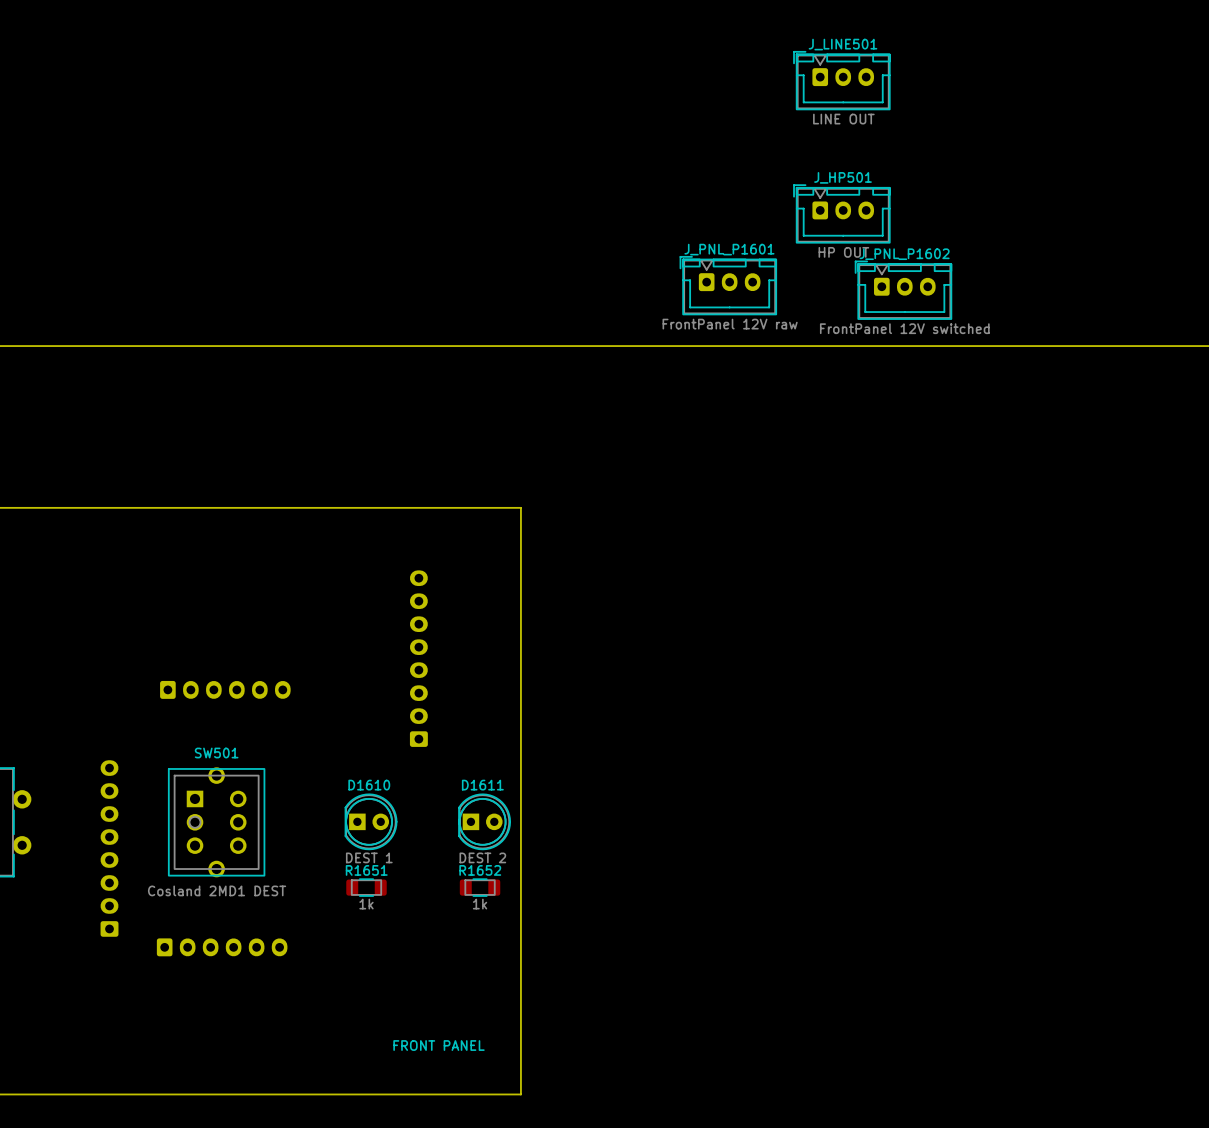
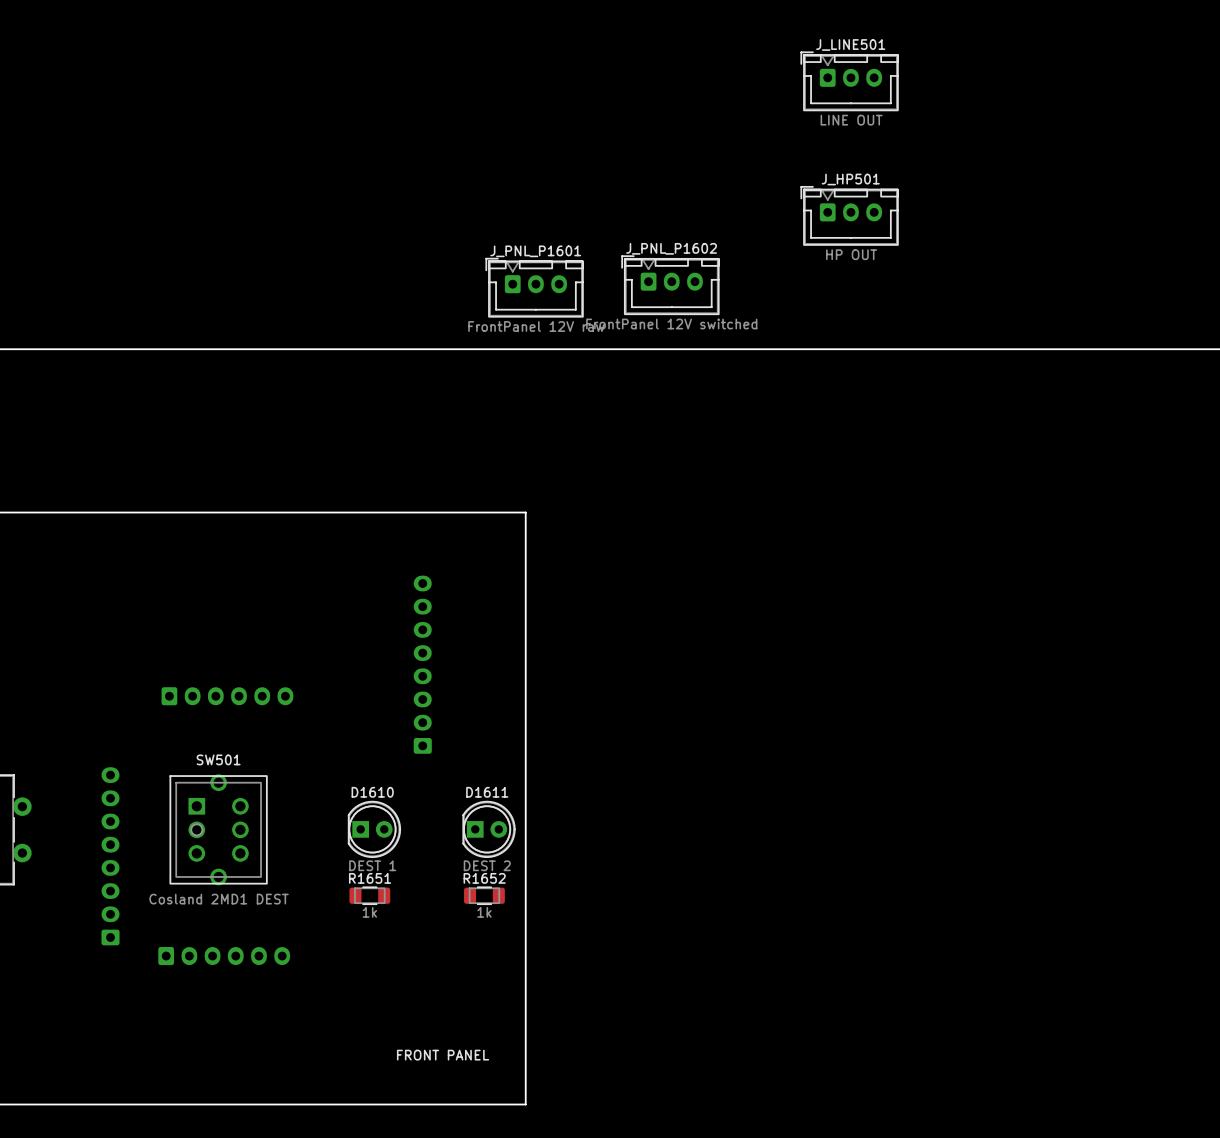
J_PNL_P1601 position: (728, 285) -> (534, 287)
J_PNL_P1602 position: (903, 290) -> (670, 285)

